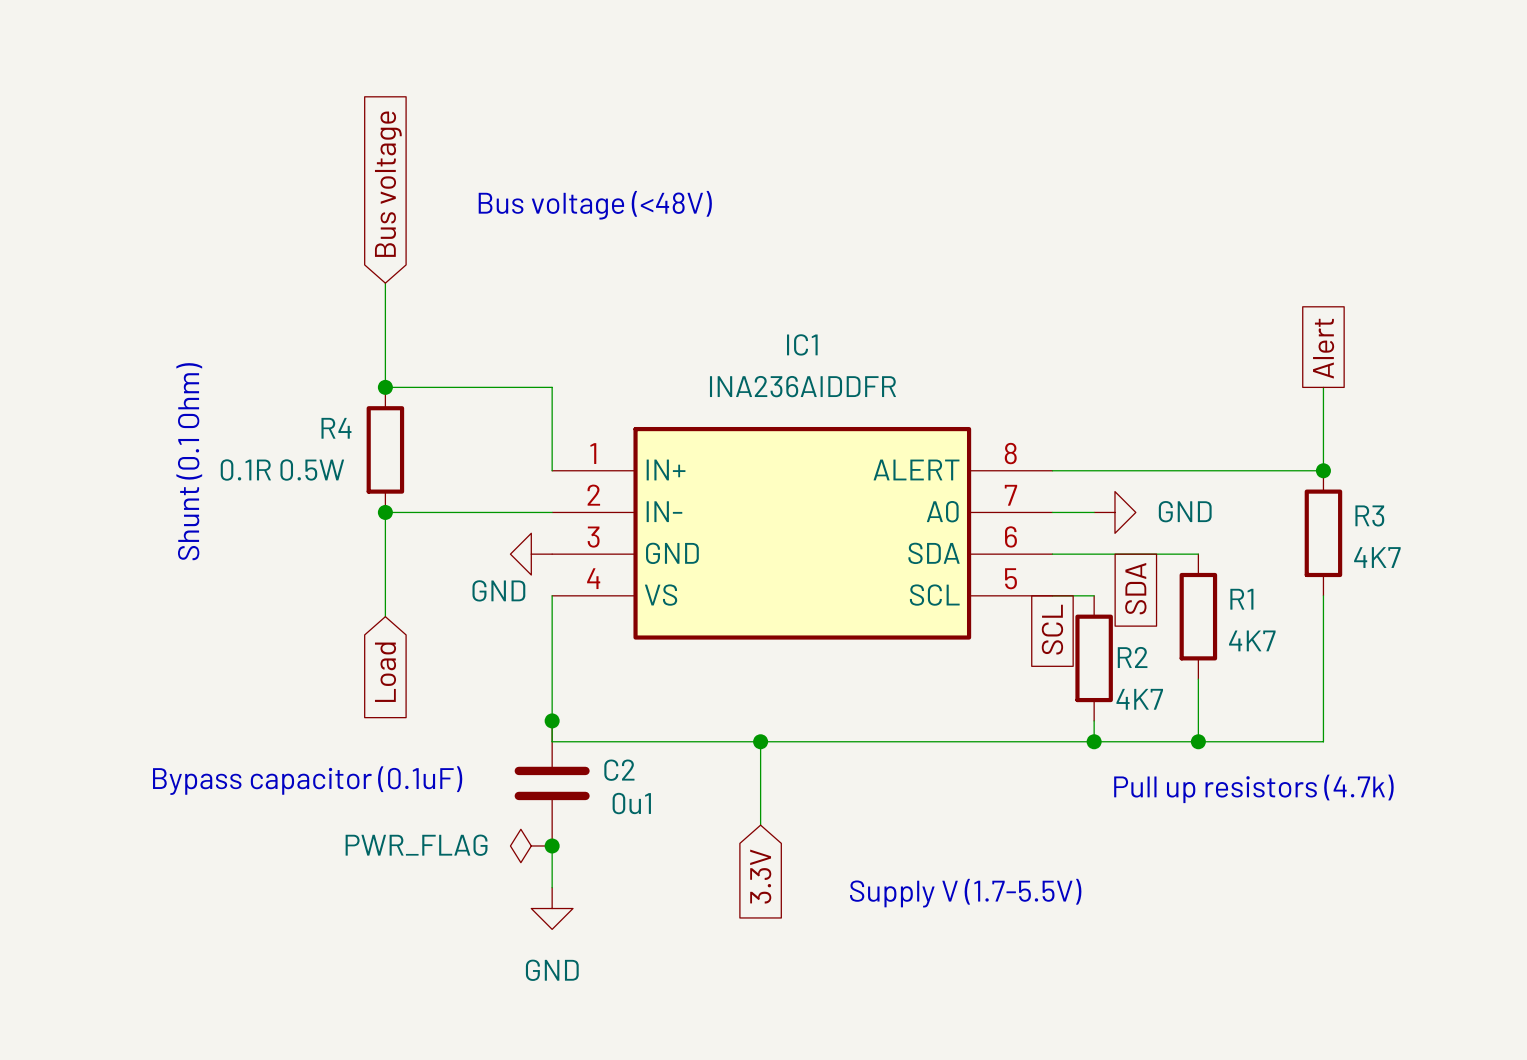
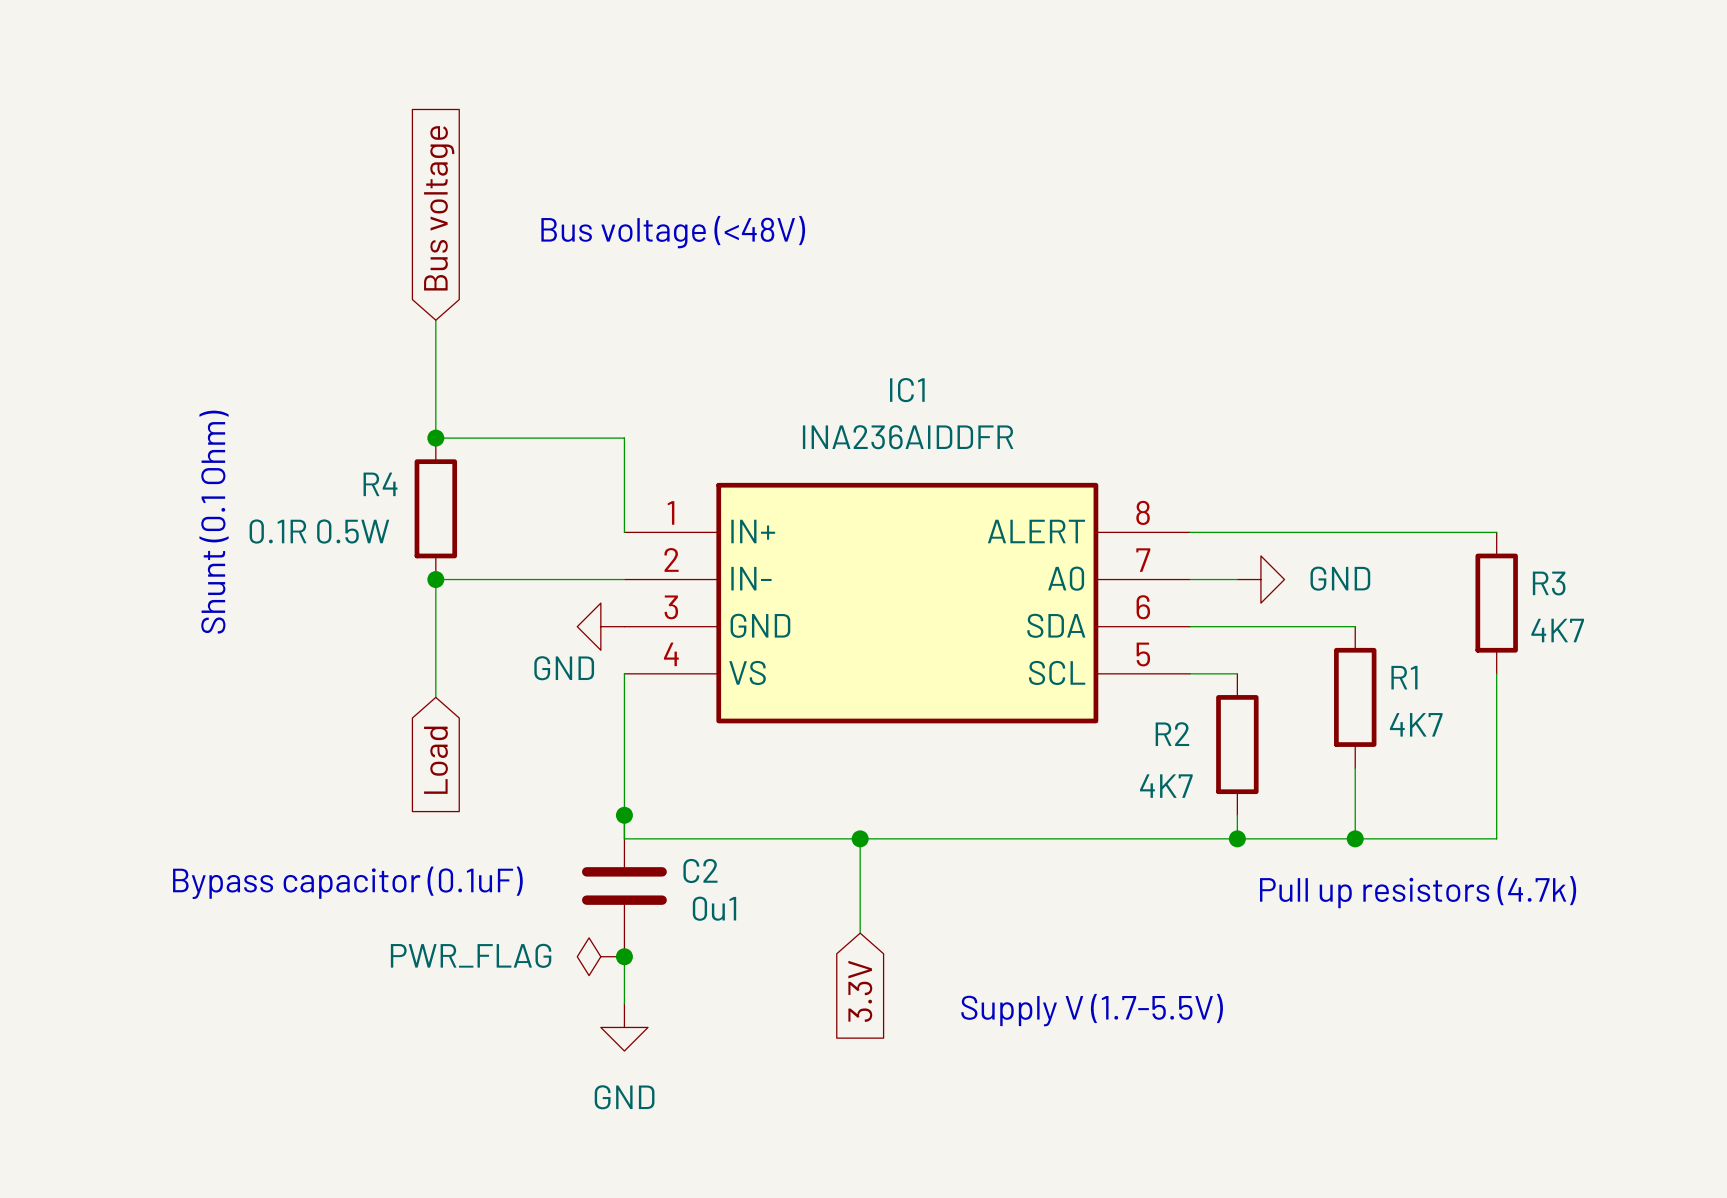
global label: Alert (1323, 348) -> none
wire: (1323, 387) (1323, 470) -> none
junction: (1323, 470) -> none
global label: SDA (1135, 588) -> none
global label: SCL (1052, 629) -> none
R2 name position: R2 (1132, 657) -> R2 (1172, 734)
R2 value position: 4K7 (1139, 699) -> 4K7 (1166, 786)

